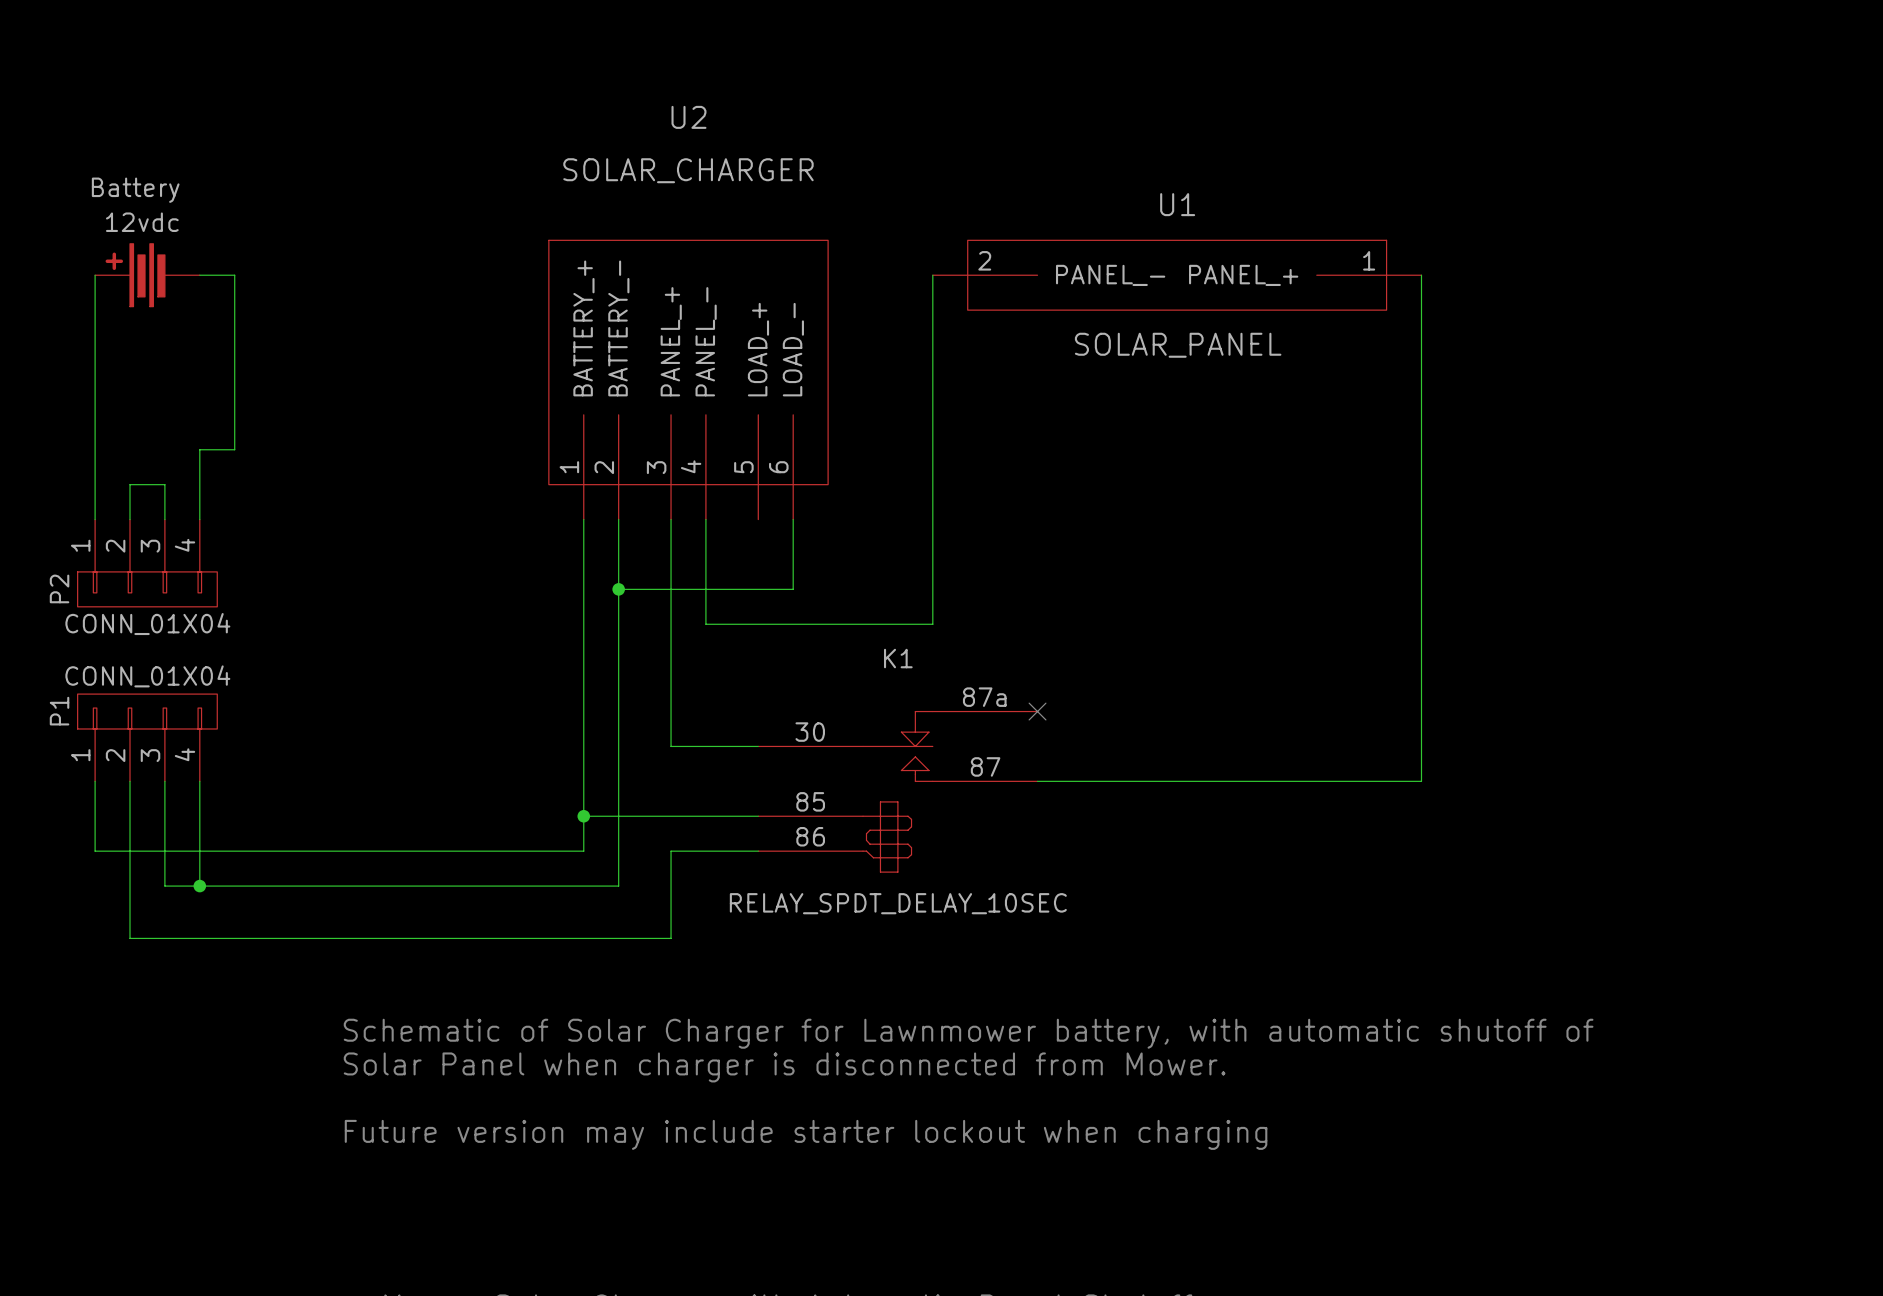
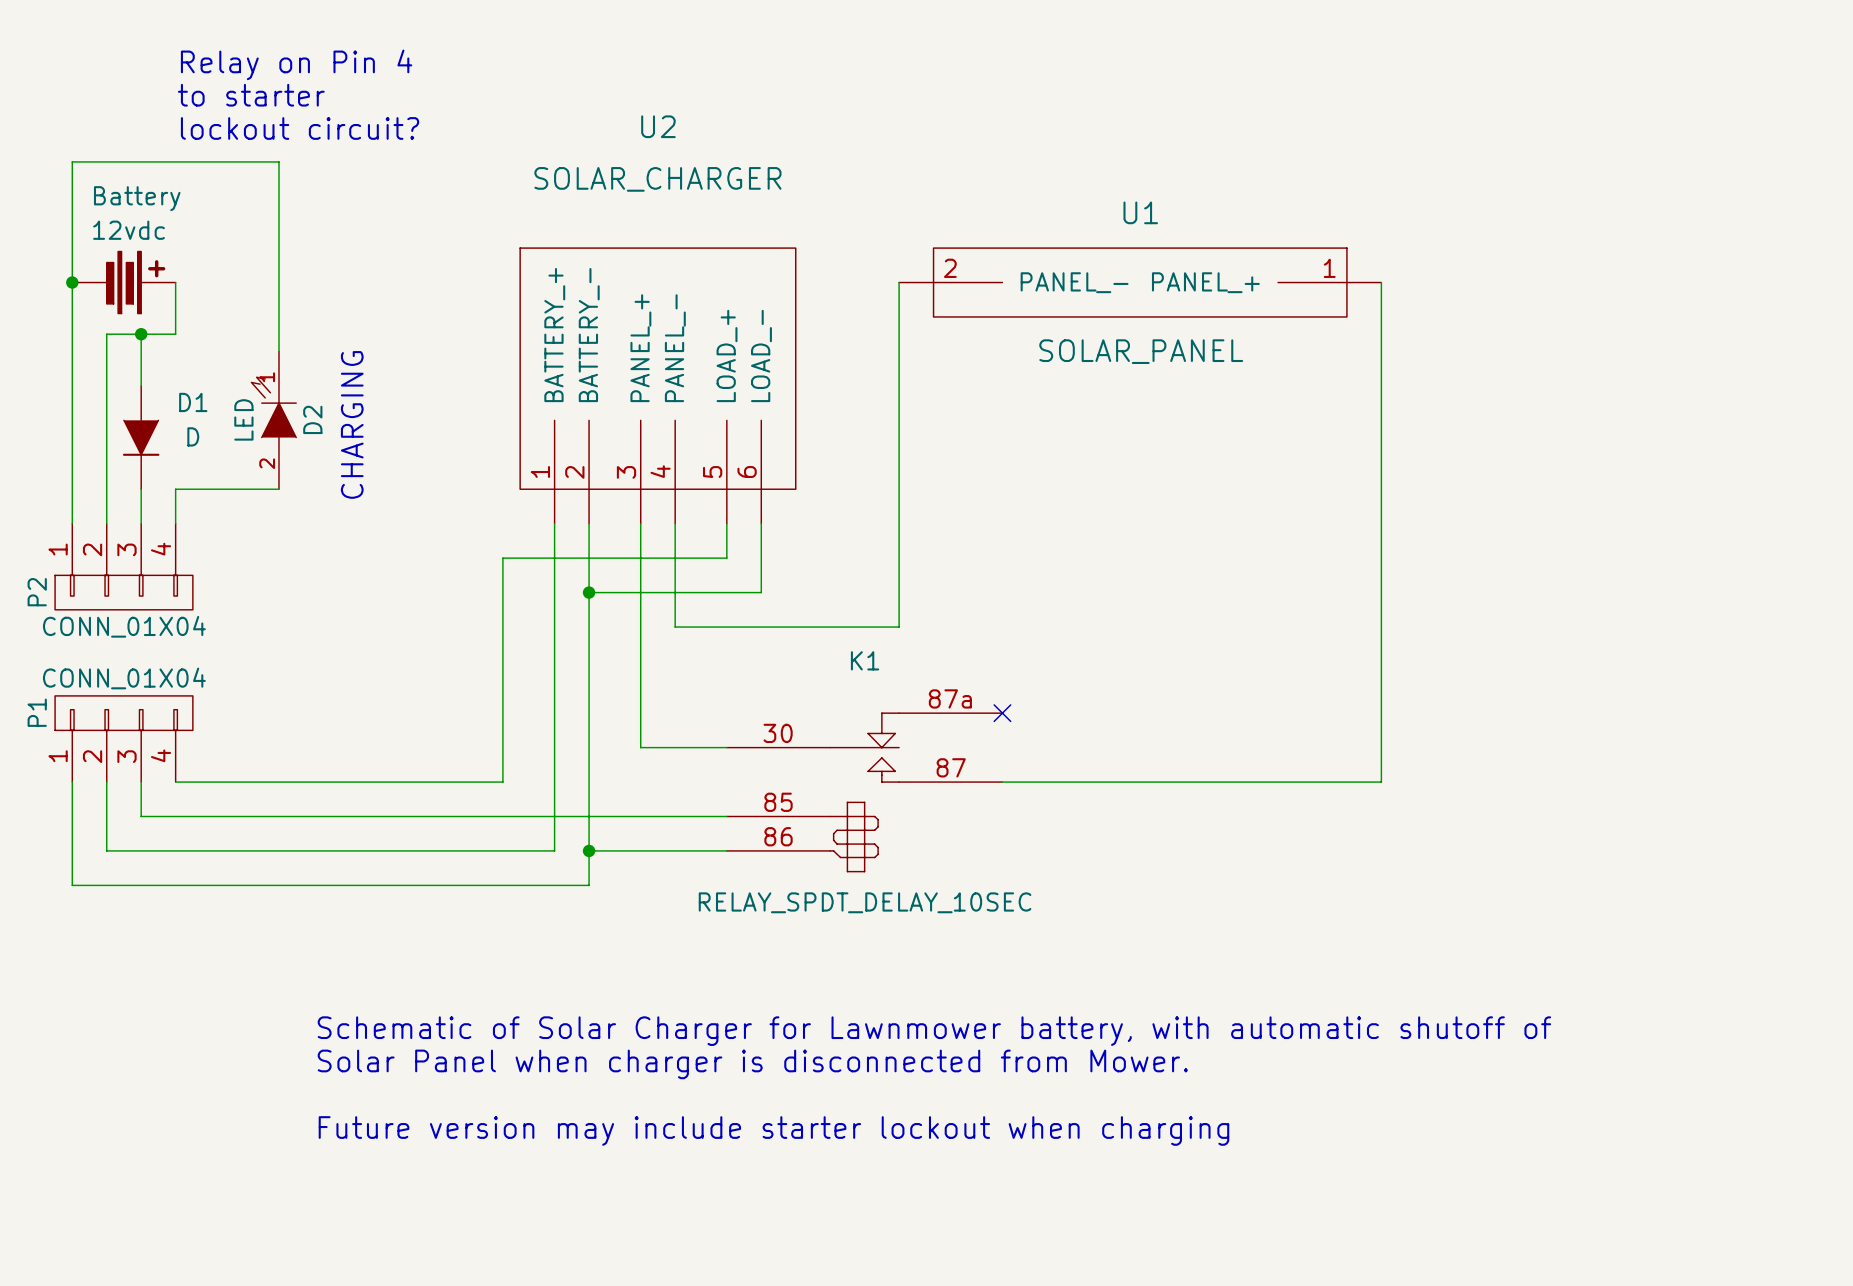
text: none -> Relay on Pin 4 (296, 64)
text: none -> to starter (251, 95)
text: none -> lockout circuit? (300, 128)
wire: none -> (72, 282) (72, 161) (278, 161) (278, 351)
junction: none -> (72, 282)
12vdc flip: as is (135, 275) -> left-right (136, 282)
wire: (199, 275) (234, 275) (234, 449) (199, 449) (199, 484) -> (175, 282) (175, 334) (106, 334) (106, 489)
wire: none -> (141, 334) (141, 385)
junction: none -> (141, 334)
D2: none -> LED (273, 420)
text: none -> CHARGING (352, 424)
D1: none -> D (141, 437)
wire: (130, 484) (164, 484) -> none
wire: none -> (175, 489) (278, 489)
wire: (199, 781) (199, 886) -> (175, 782) (502, 782) (502, 558) (726, 558) (726, 523)
wire: (164, 816) (164, 886) -> (72, 850) (72, 885) (141, 885)
wire: none -> (141, 816) (554, 816)
junction position: (583, 816) -> (589, 850)
wire: (95, 851) (130, 851) (130, 938) (671, 938) (671, 851) -> (589, 850) (640, 850)
junction: (199, 886) -> none

